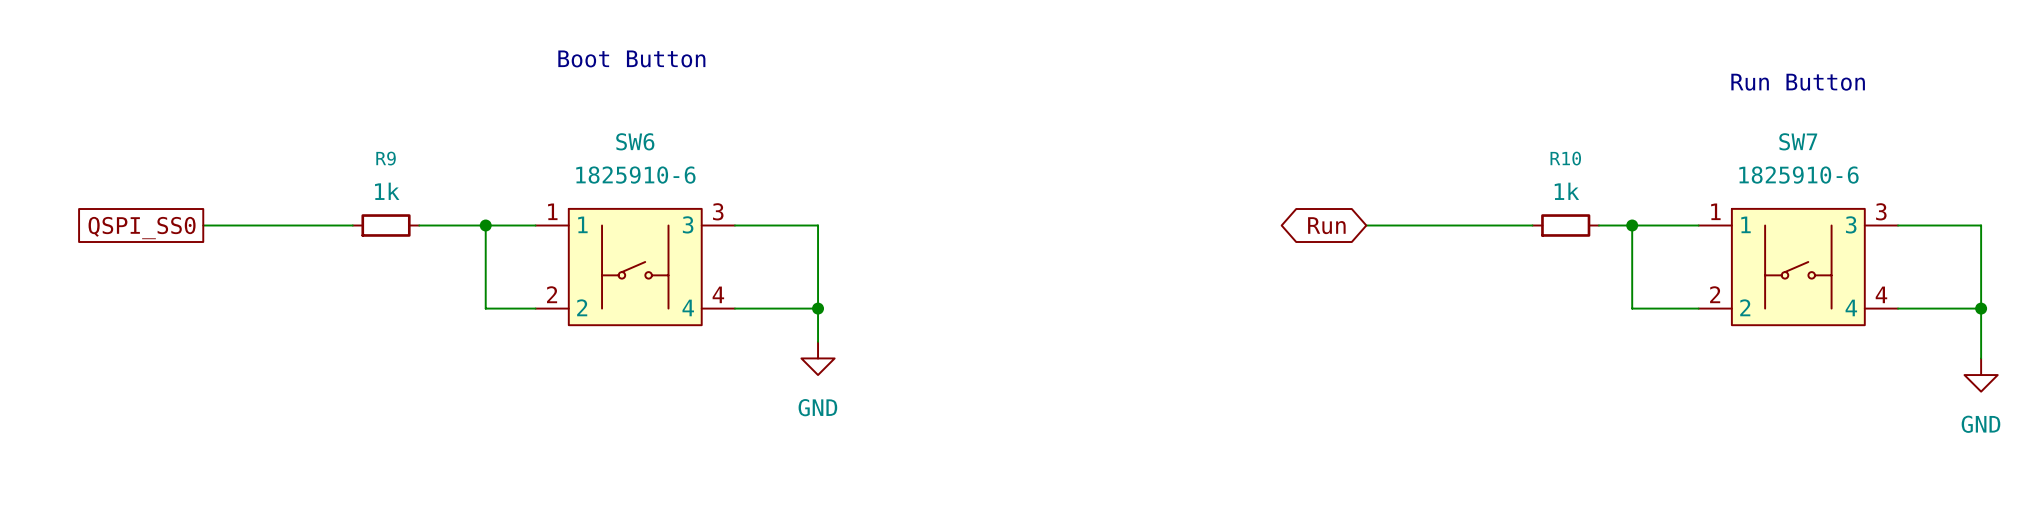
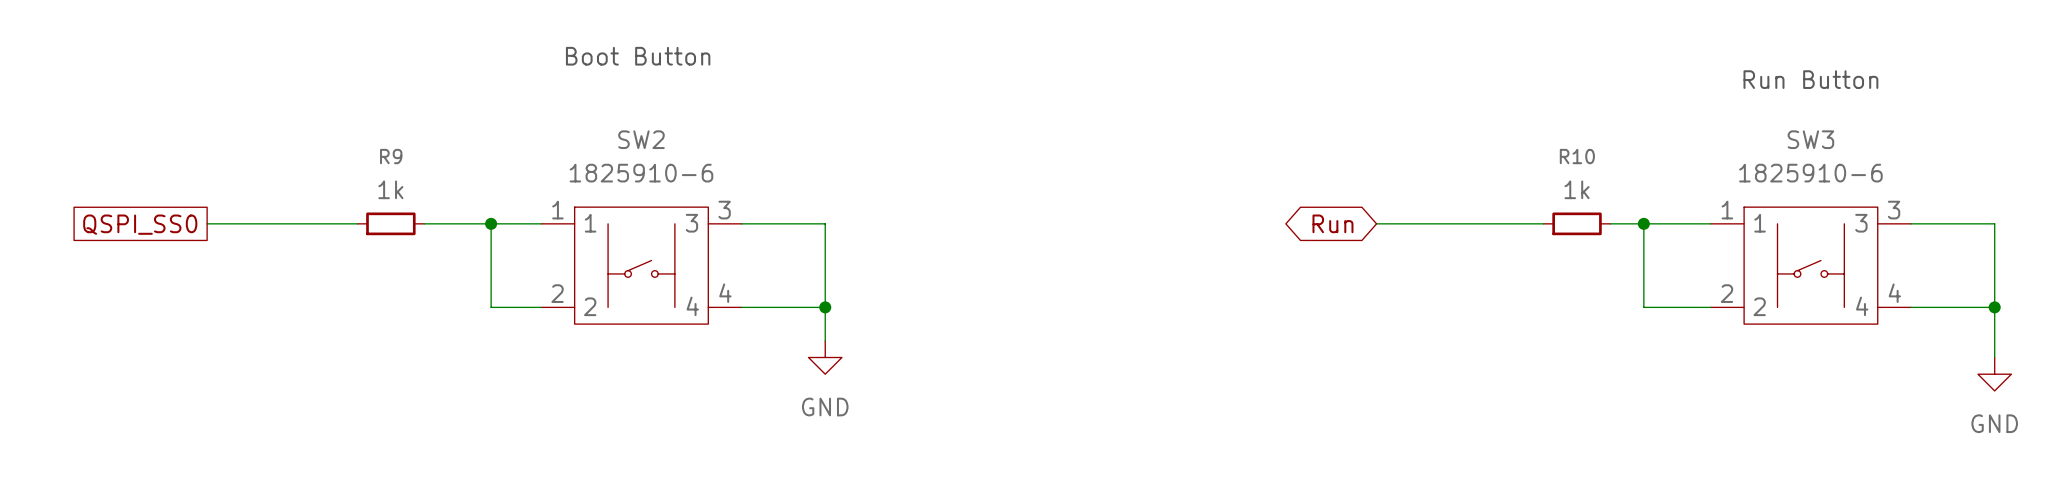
SW6 name: SW6 (635, 141) -> SW2 (641, 139)
SW7 name: SW7 (1798, 141) -> SW3 (1810, 139)

